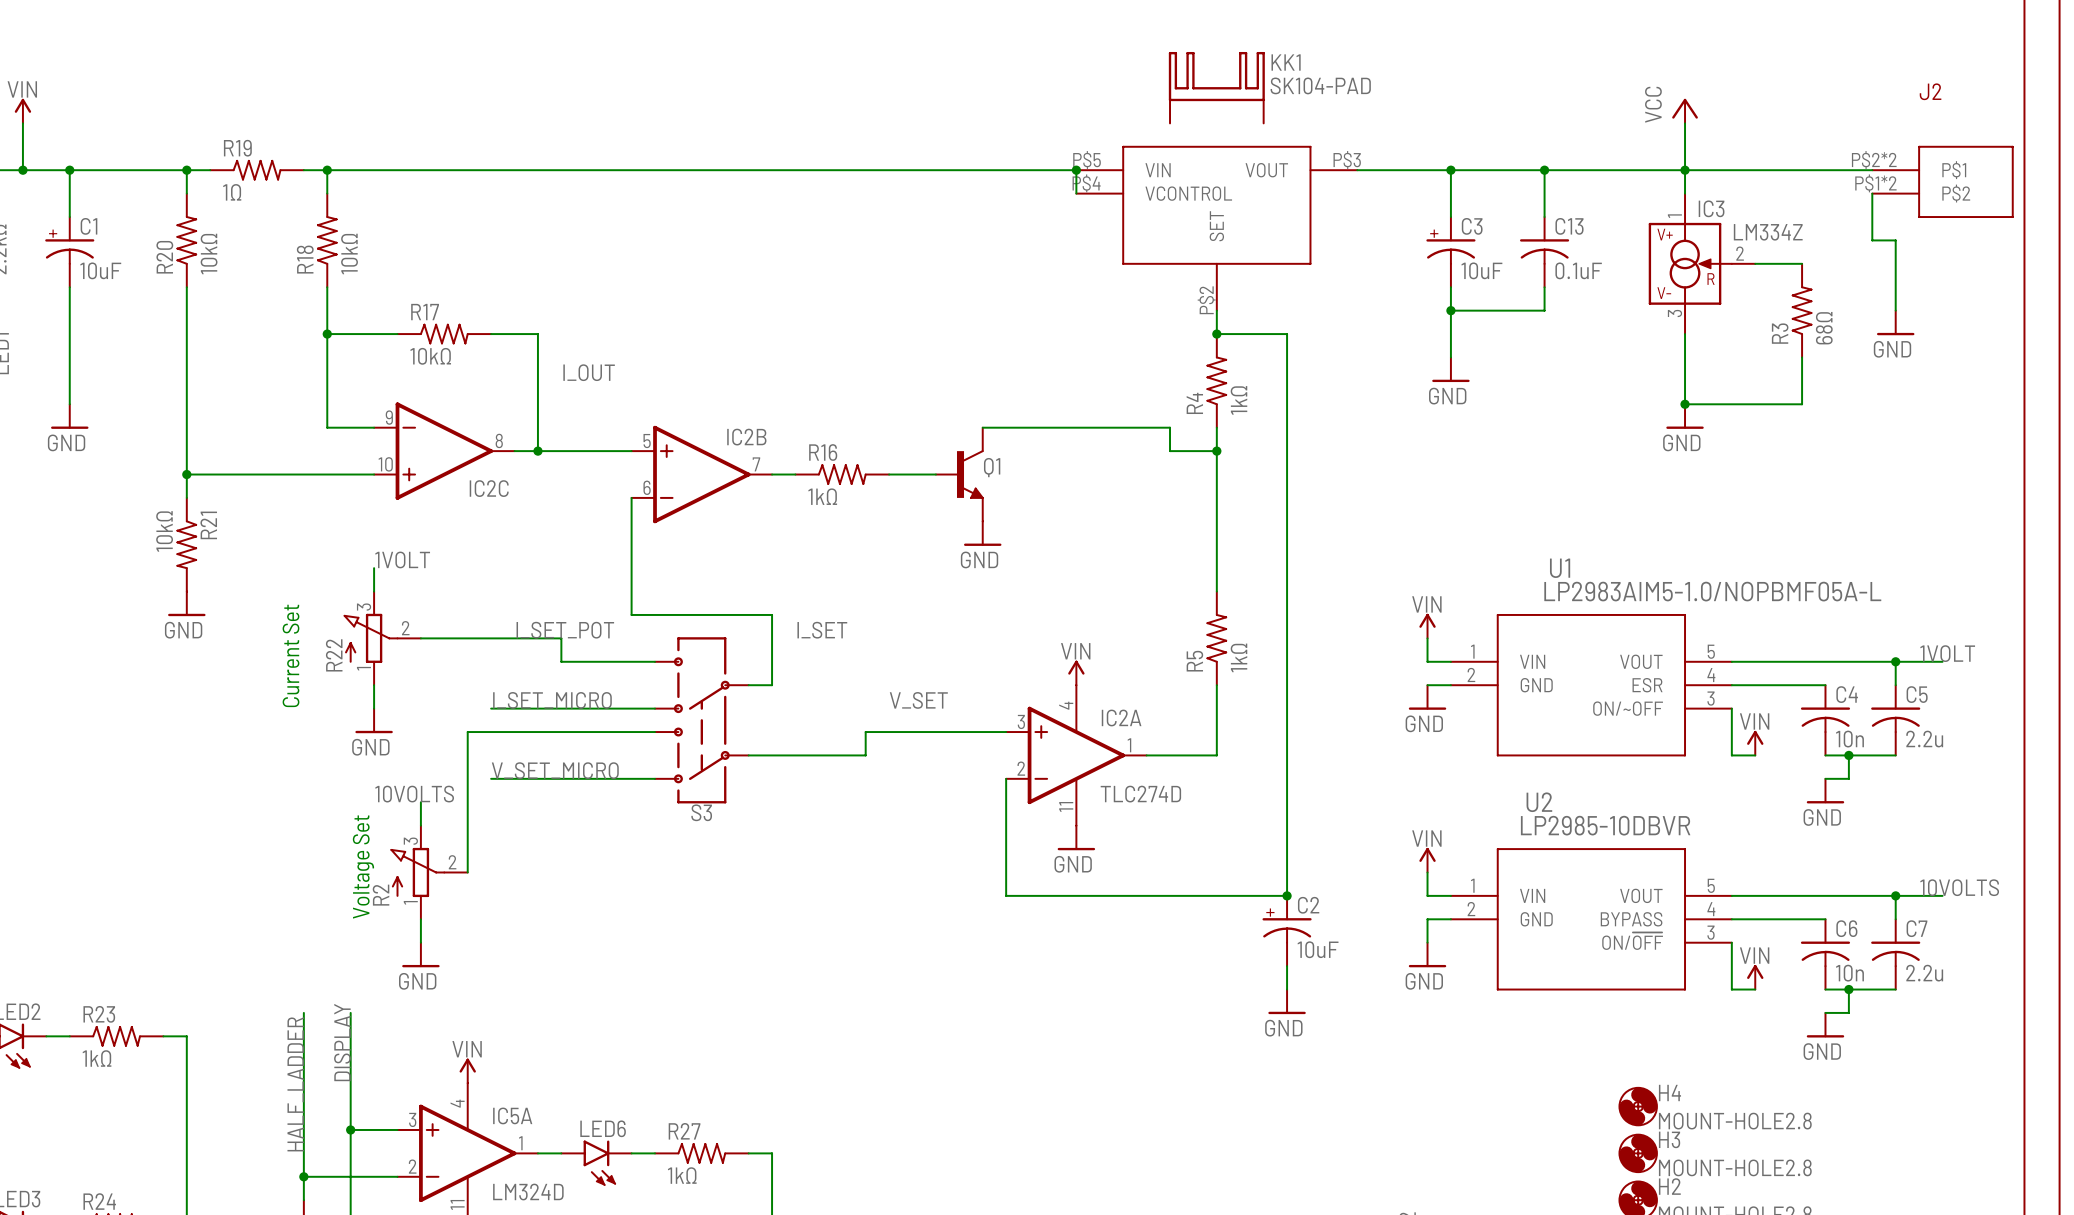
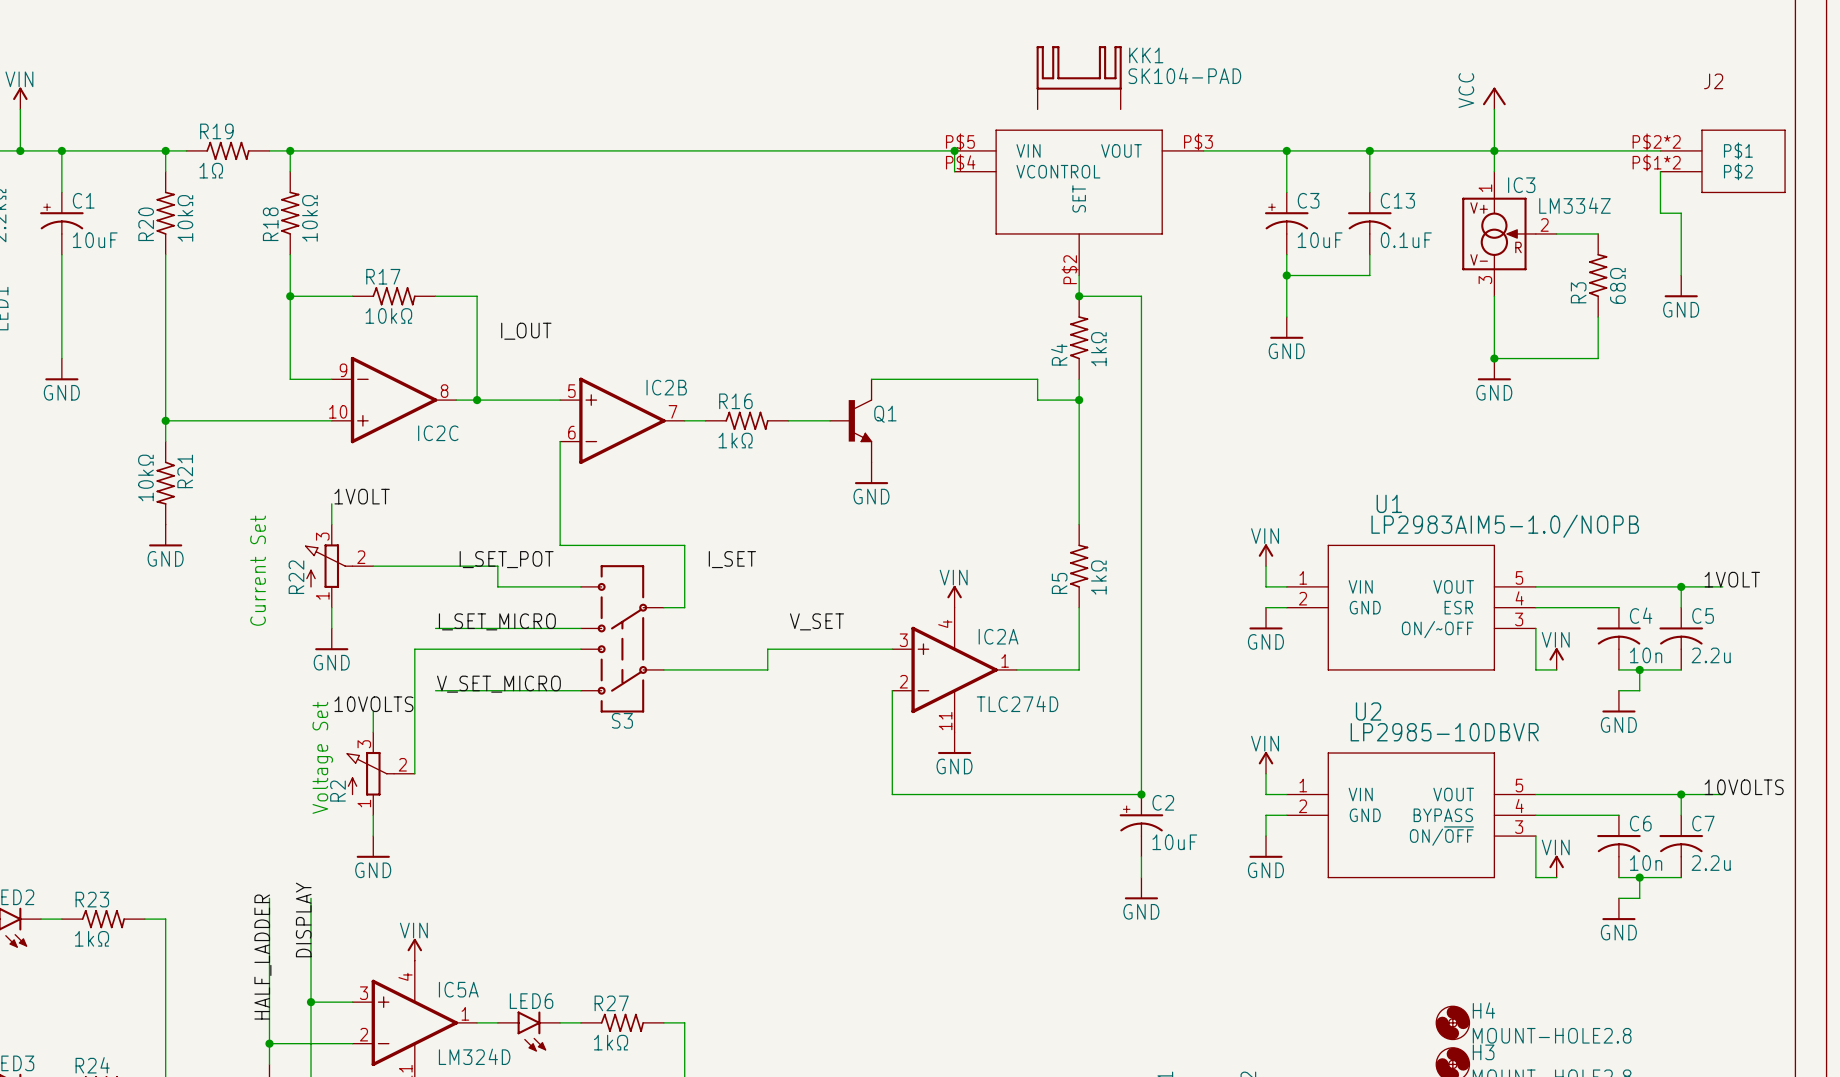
U1 value: LP2983AIM5-1.0/NOPBMF05A-L (1712, 591) -> LP2983AIM5-1.0/NOPB (1505, 526)
H4: MOUNT-HOLE2.8 (1638, 1106) -> none
H3 name: H3 (1669, 1139) -> H4 (1483, 1010)
H2 name: H2 (1669, 1186) -> H3 (1483, 1052)

